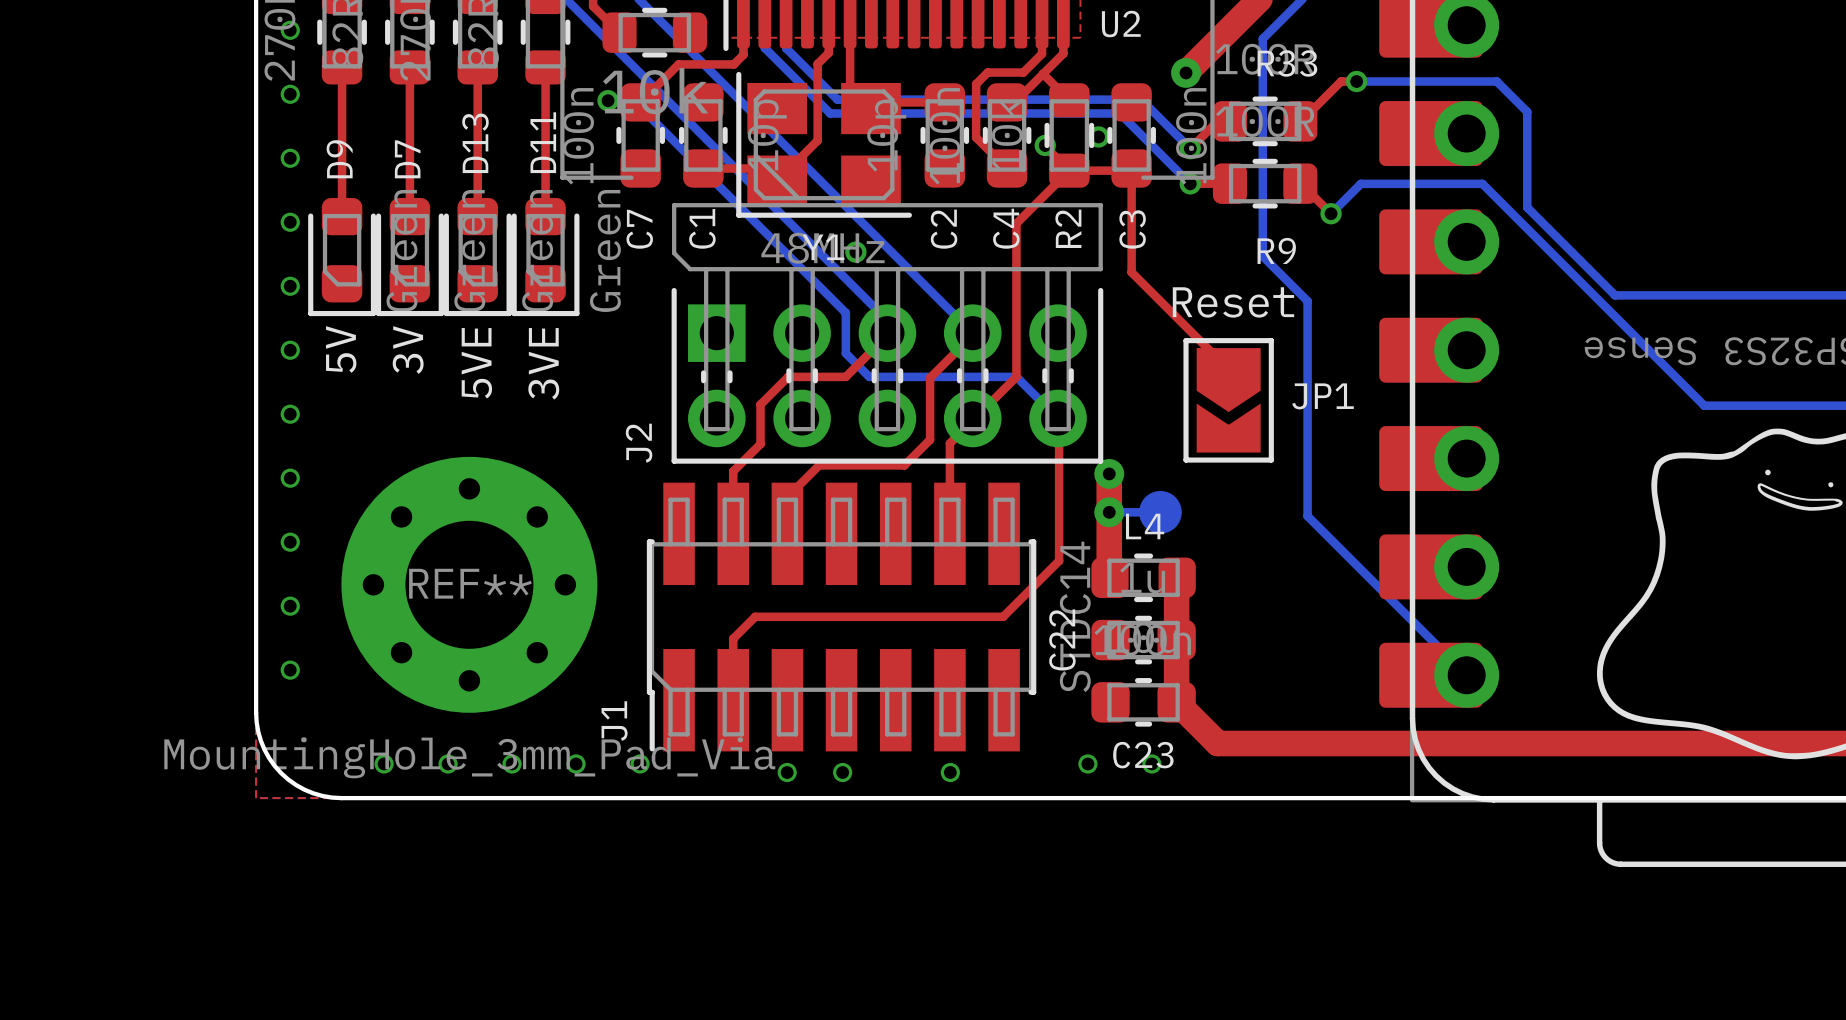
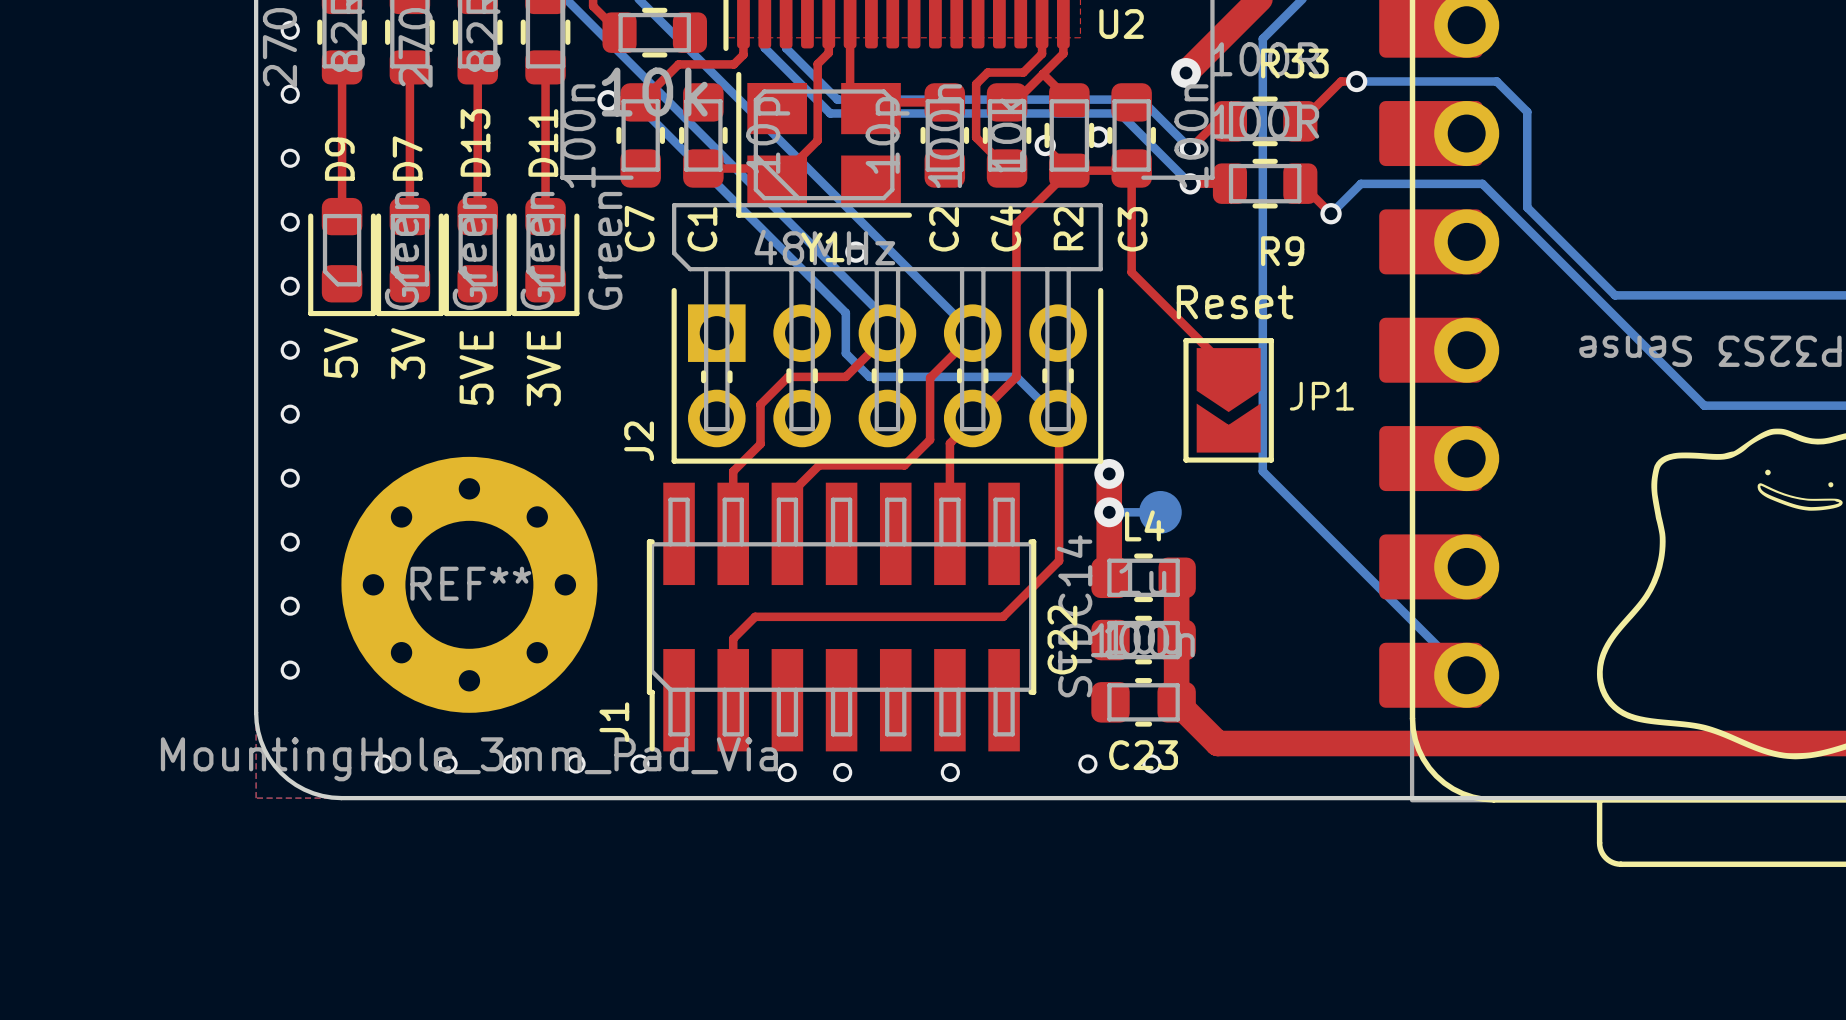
bottom track: (1262, 256) (1307, 301) (1307, 516) -> (1262, 256) (1262, 471) (1307, 516)

